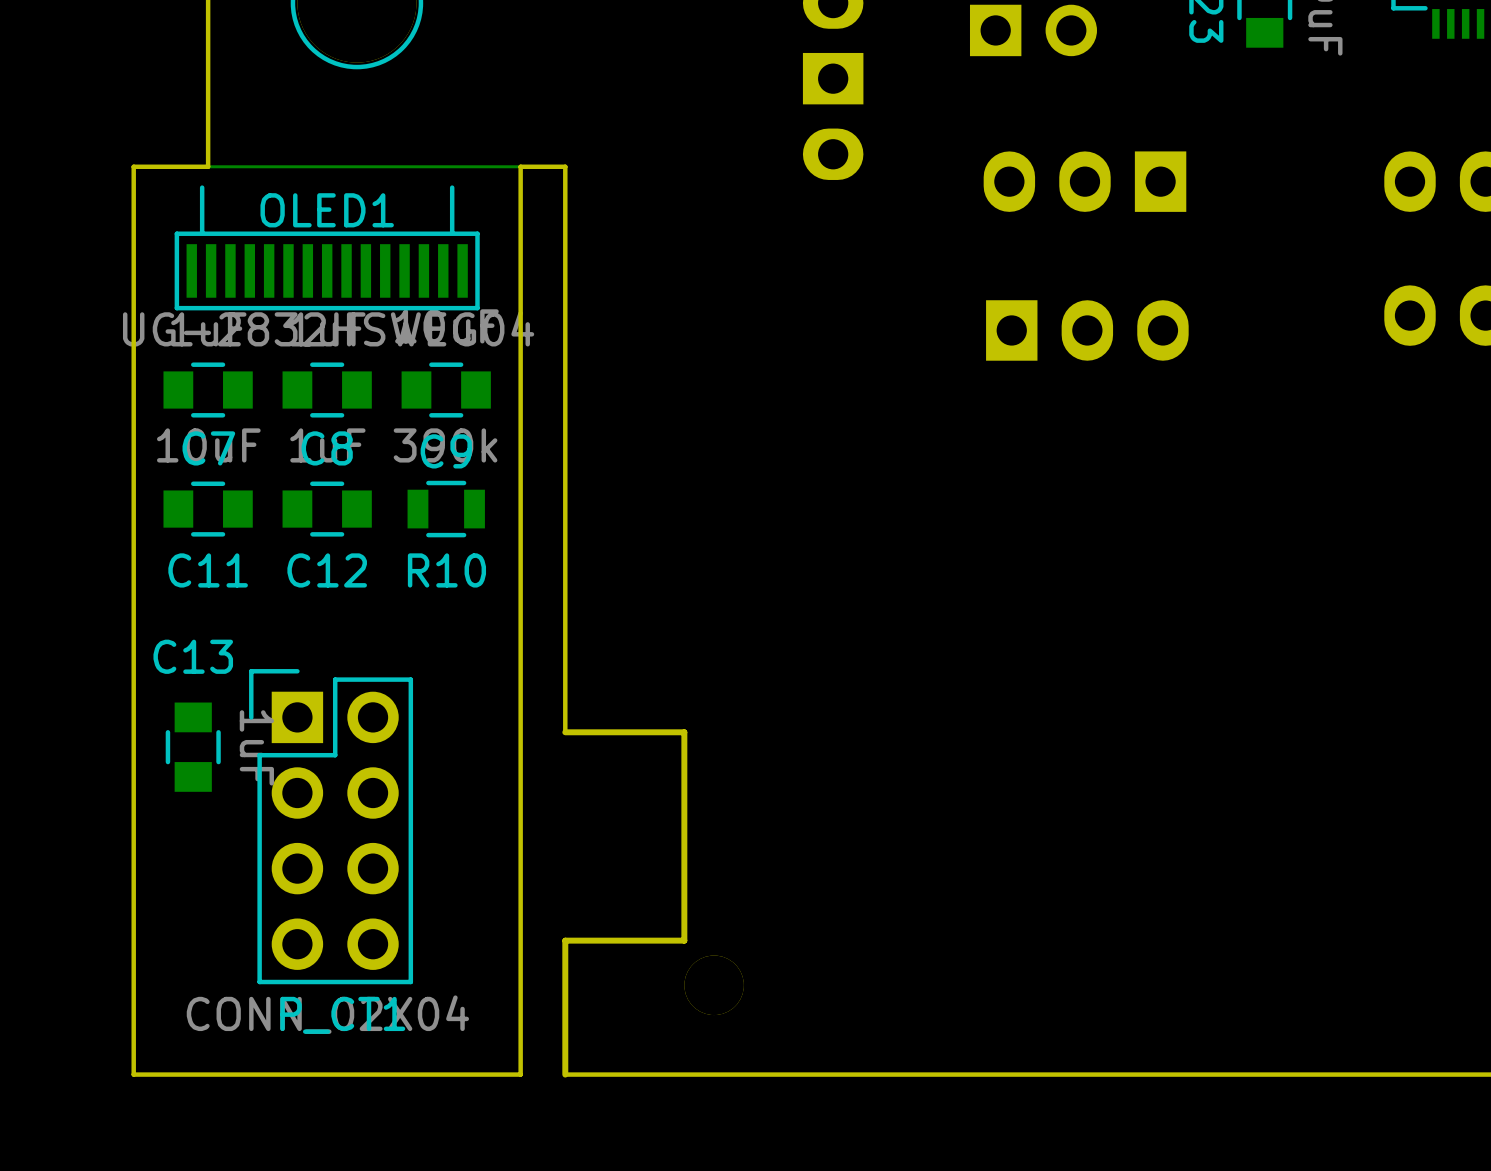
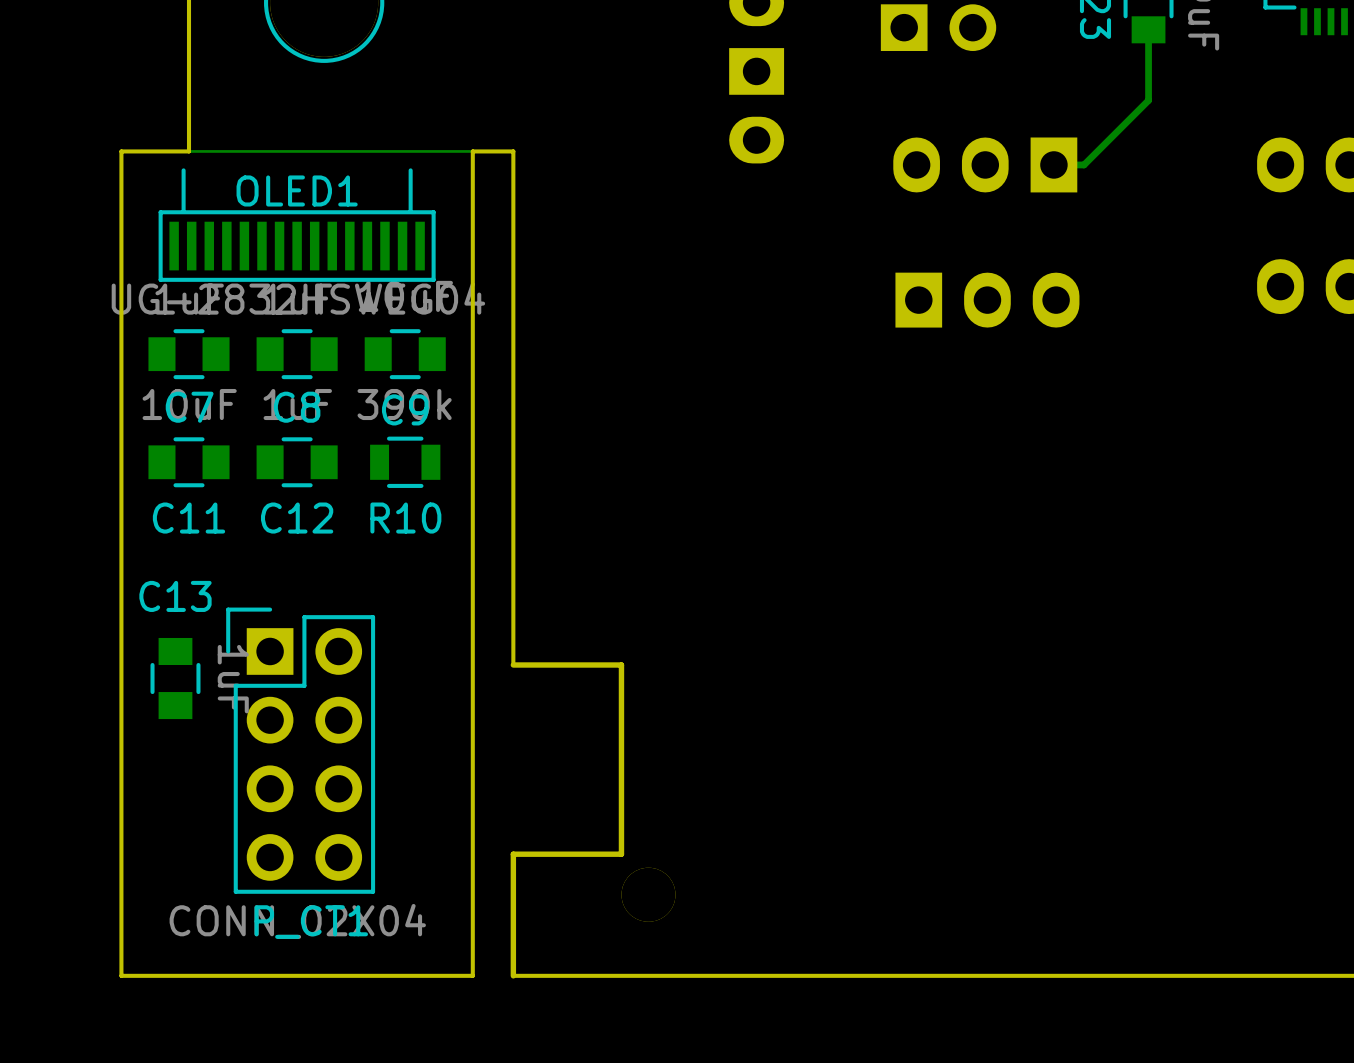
track: none -> (1148, 29) (1148, 100) (1084, 164) (1053, 164)

